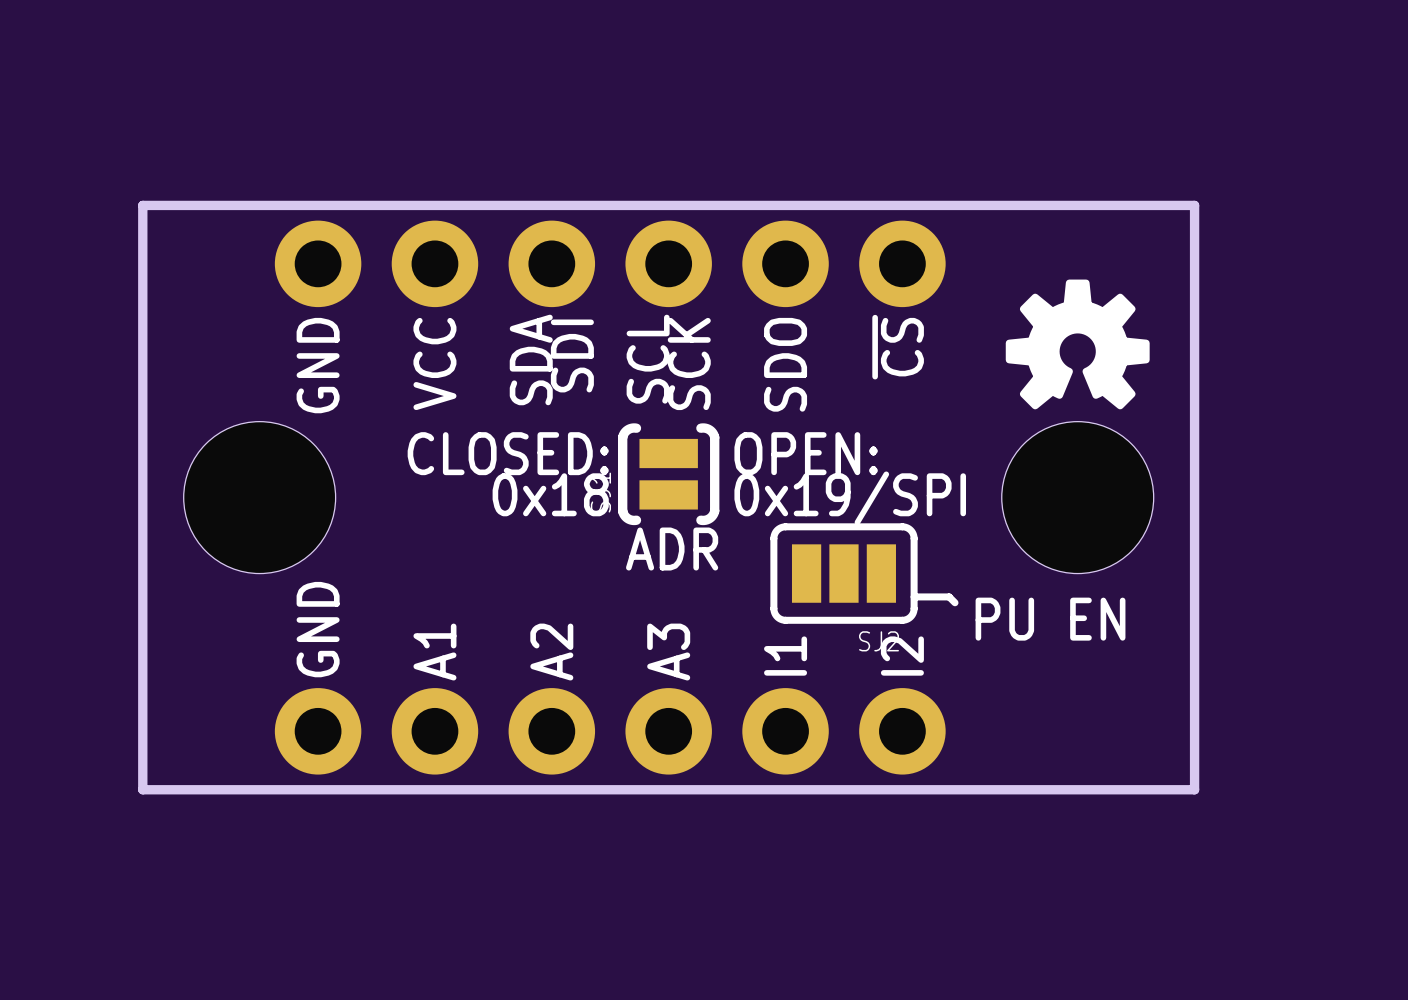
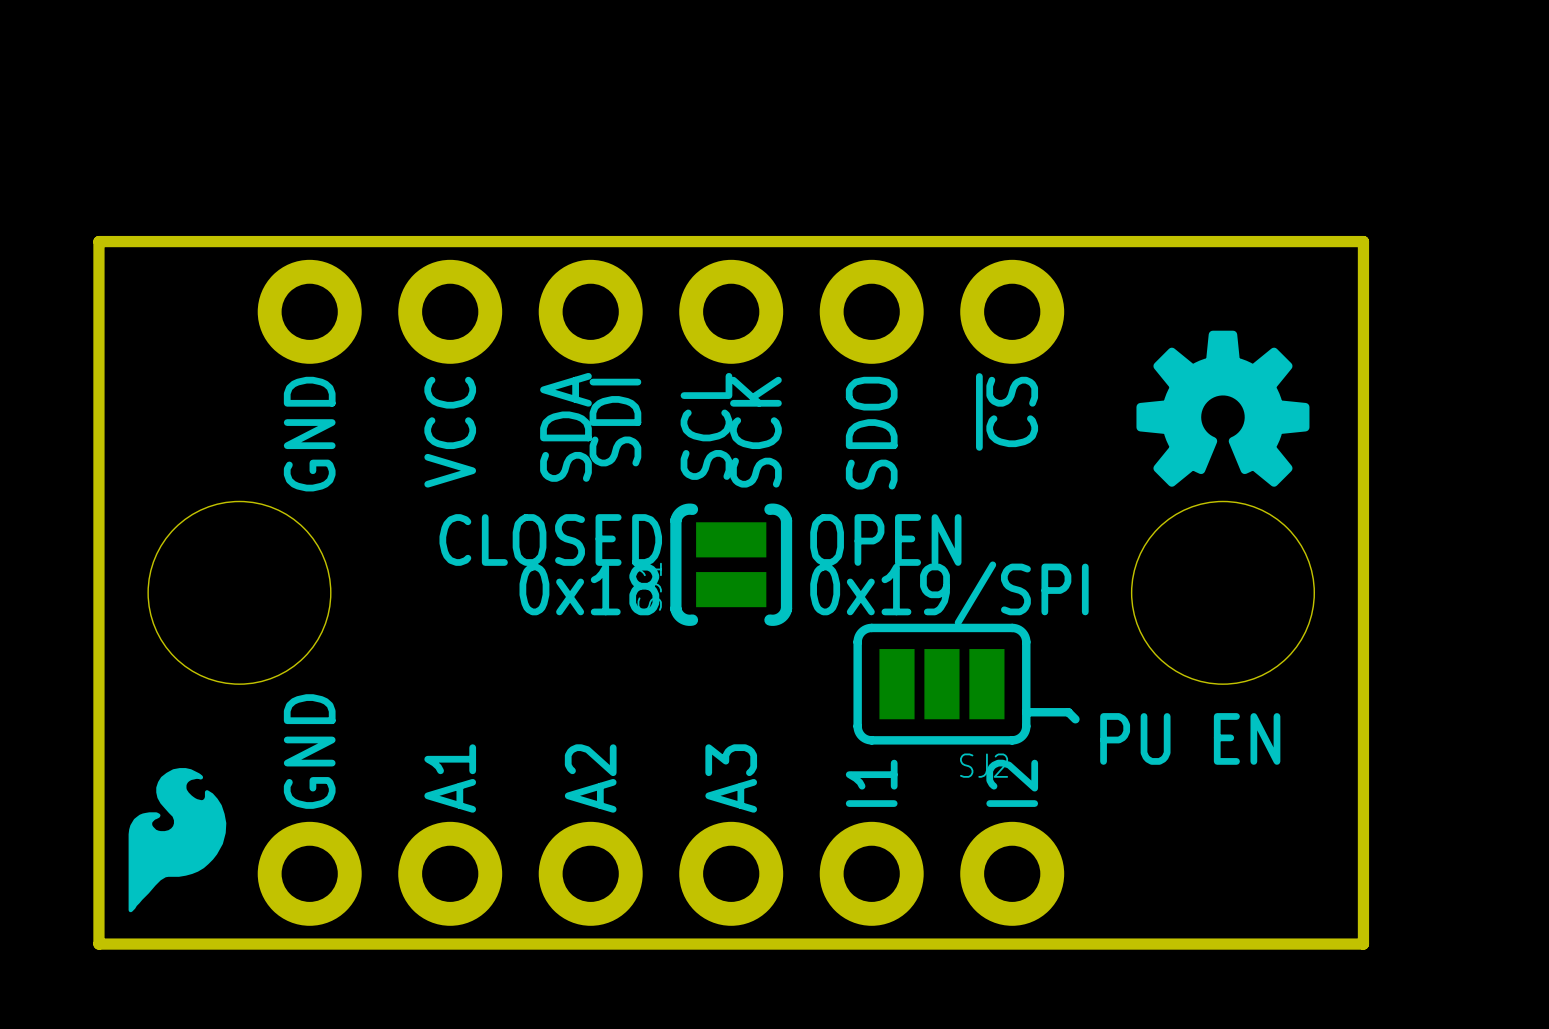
text: CLOSED: (508, 453) -> CLOSED (550, 539)
text: OPEN: (806, 453) -> OPEN (885, 539)
text: ADR (672, 549) -> none
drawing: none -> [128, 768, 227, 913]

